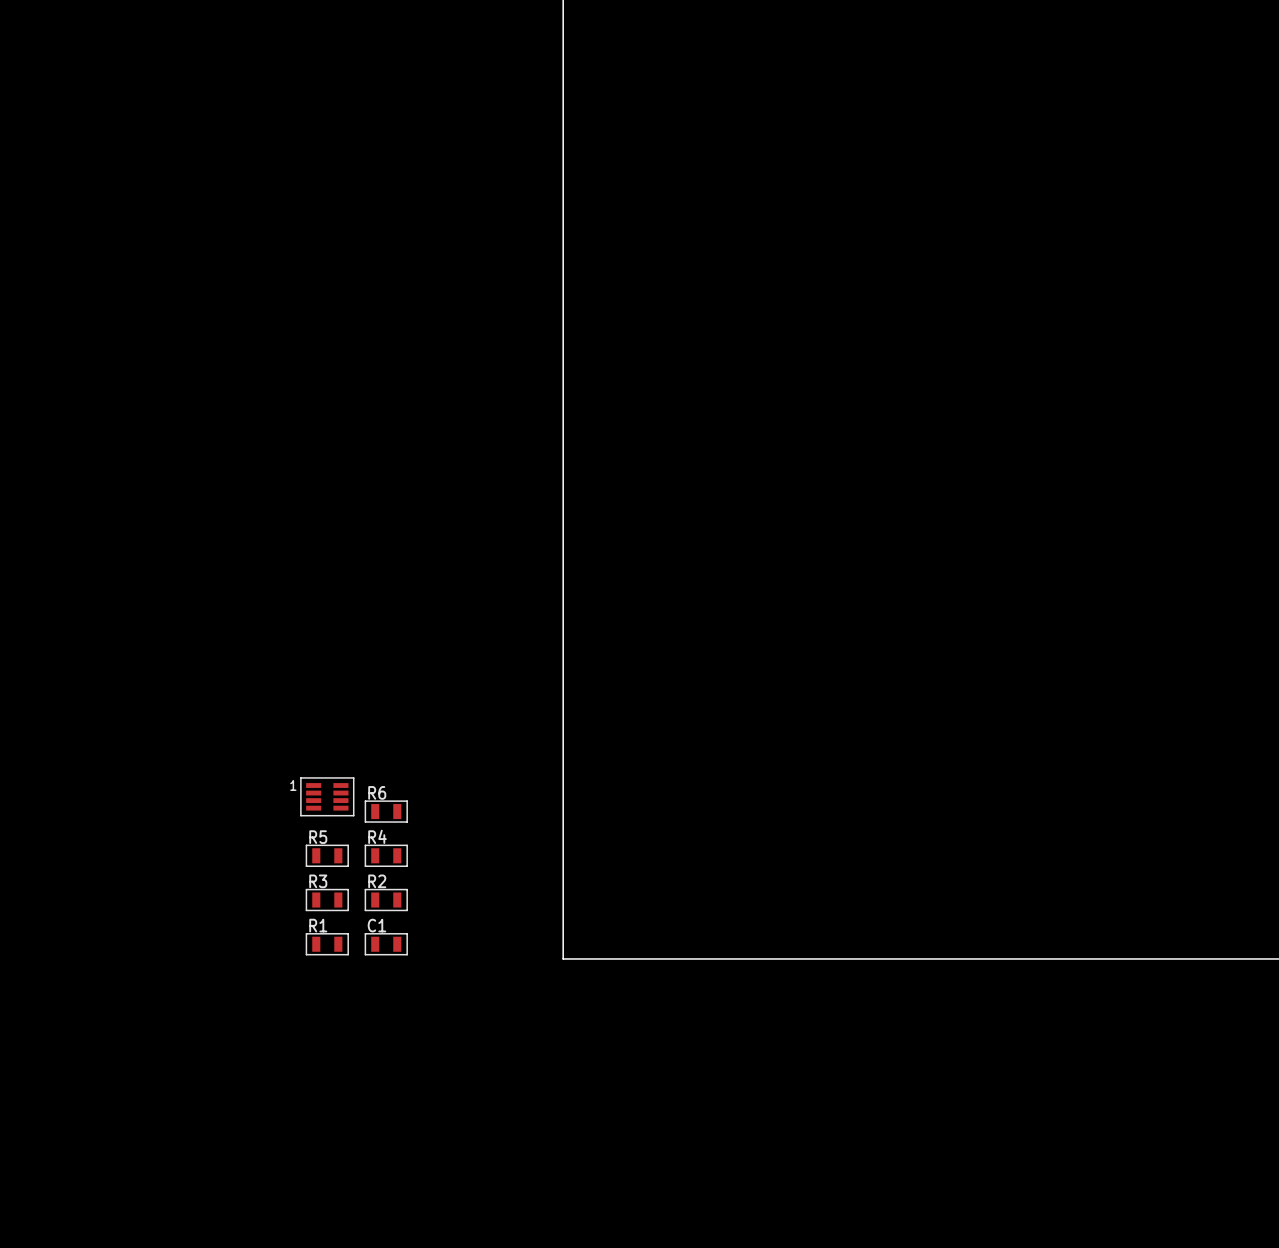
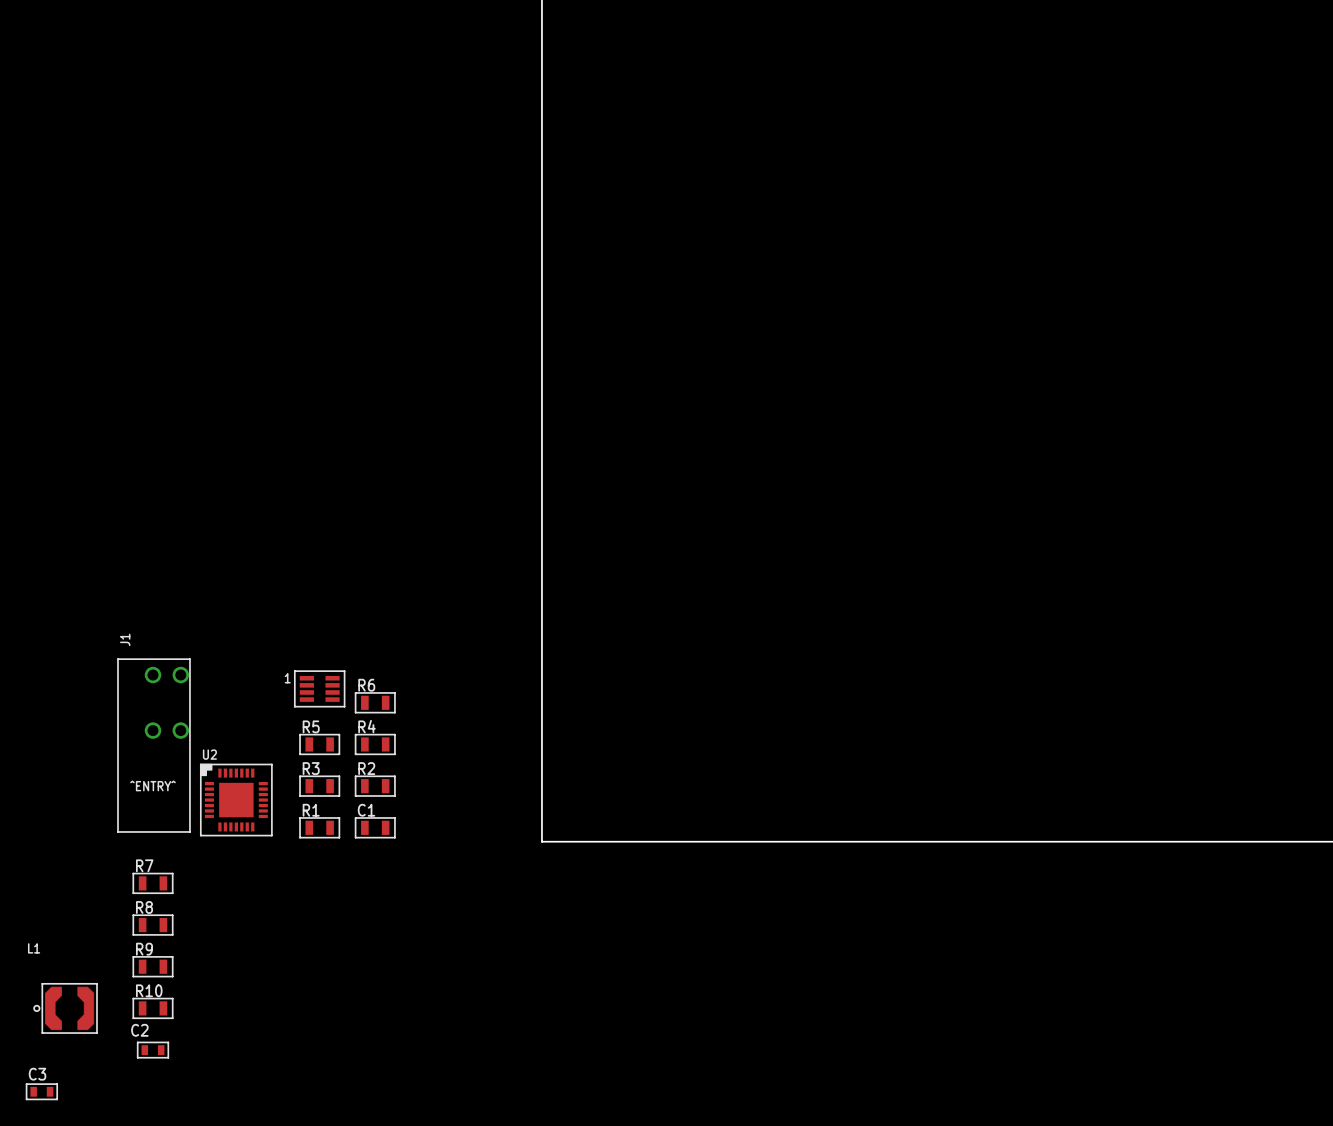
J1: none -> (153, 745)
U2: none -> (236, 800)
R7: none -> (153, 883)
R8: none -> (153, 925)
R9: none -> (153, 966)
L1: none -> (65, 1008)
R10: none -> (153, 1008)
C2: none -> (153, 1050)
C3: none -> (41, 1091)

